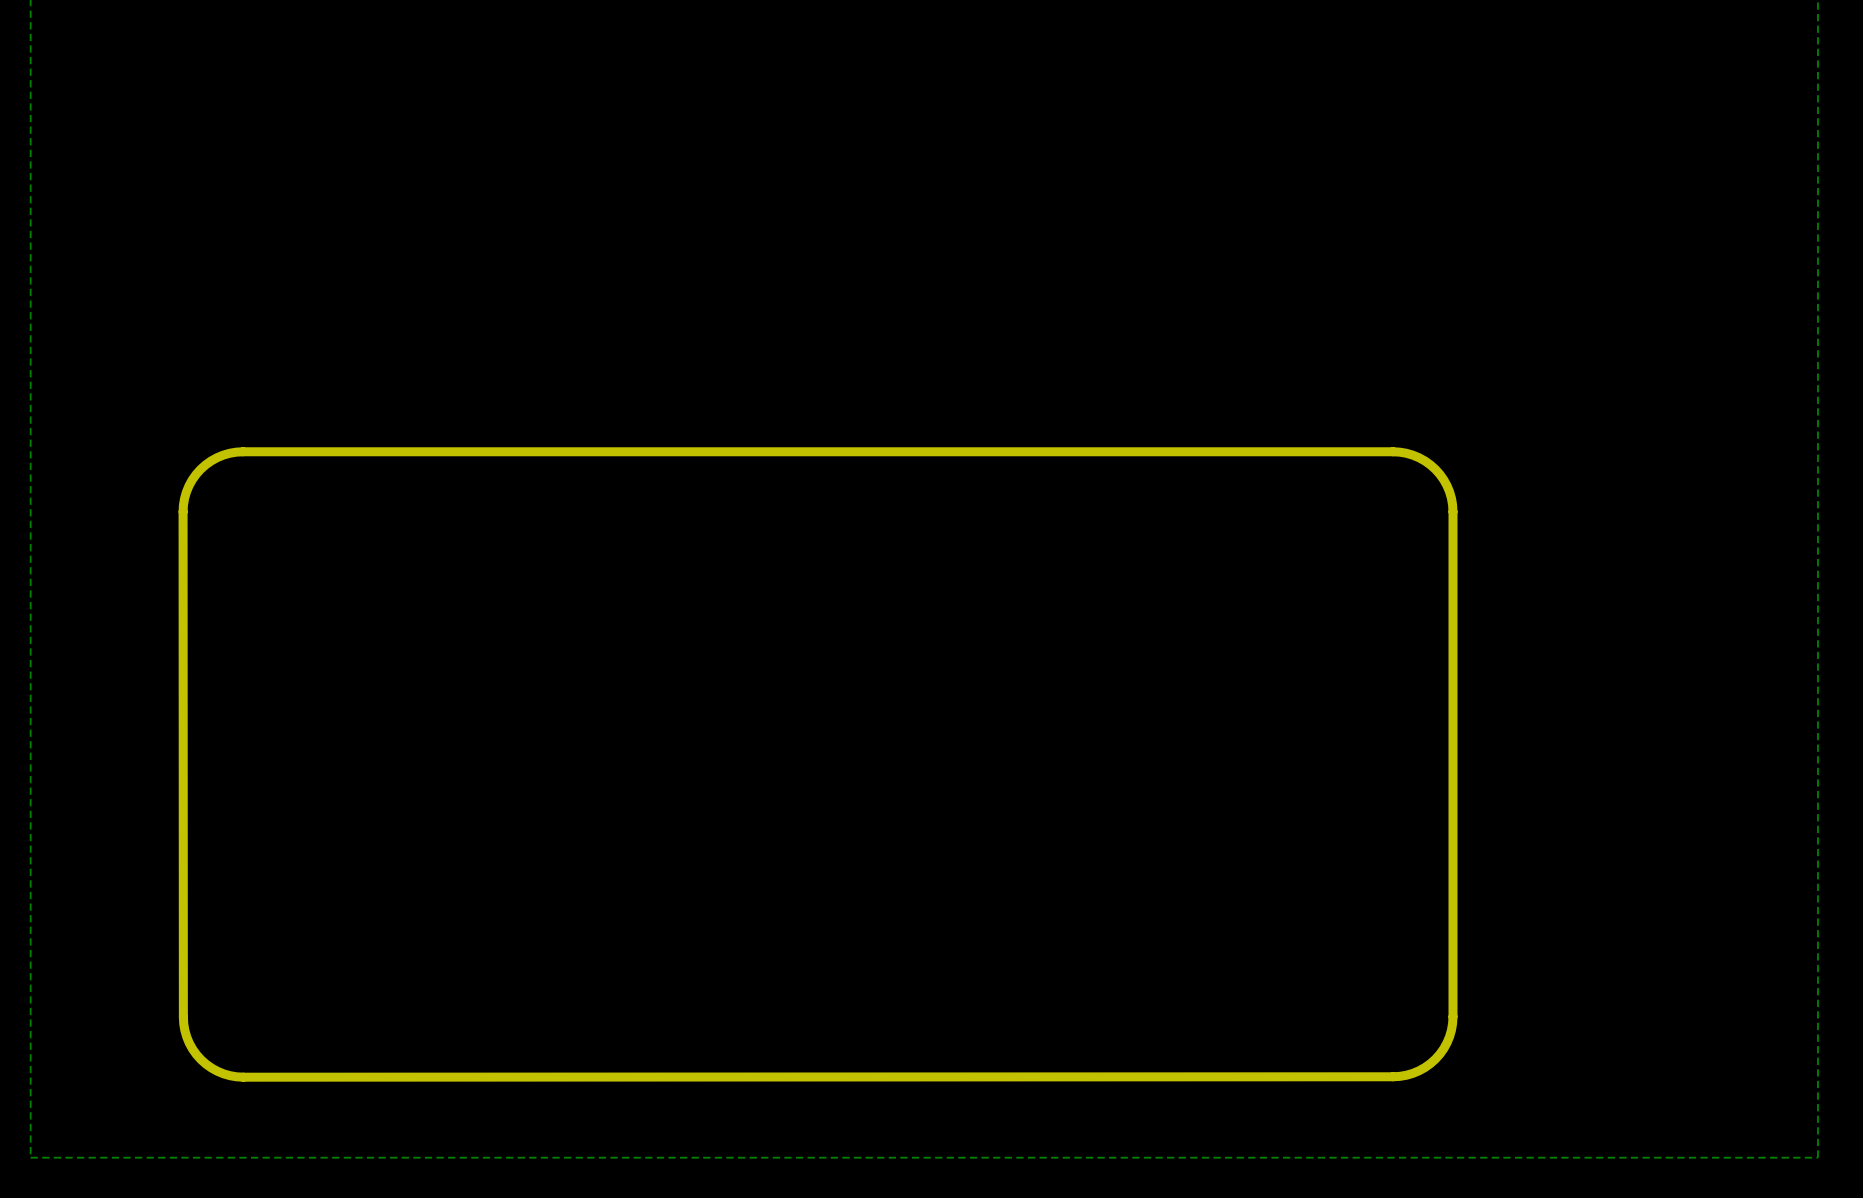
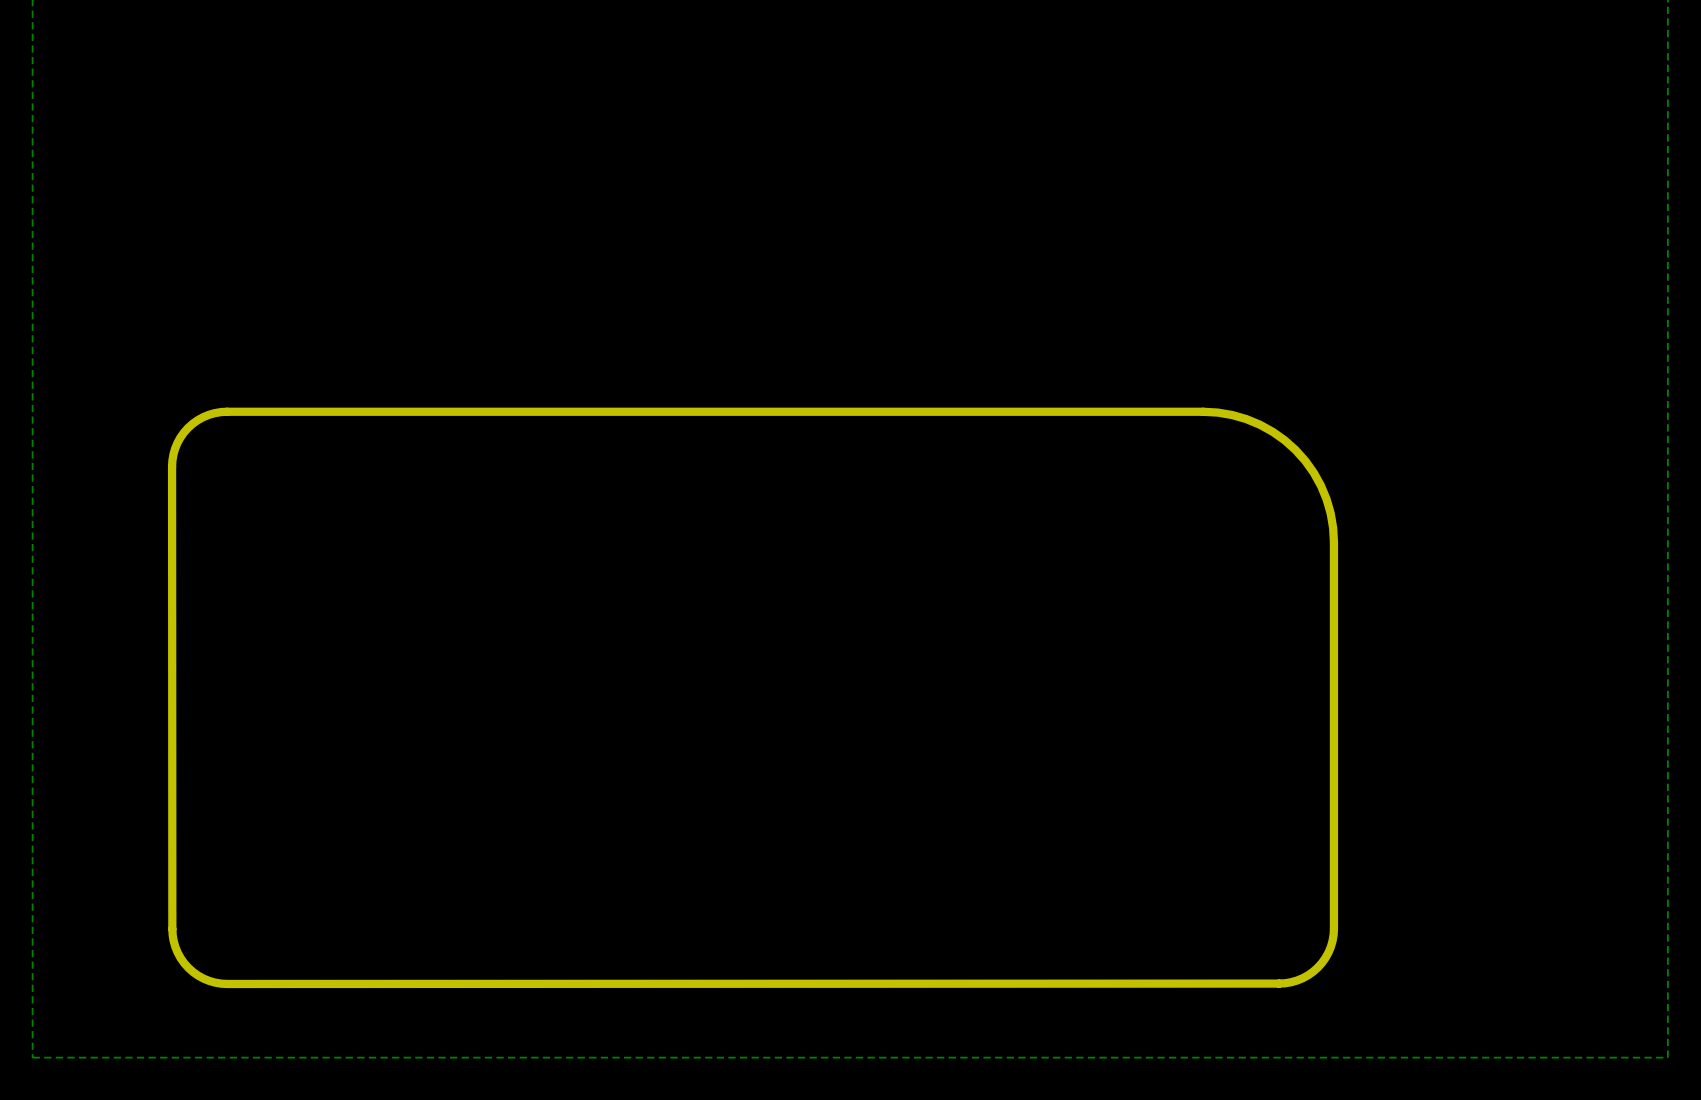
drawing shape: [178, 447, 1458, 1082] -> [167, 407, 1339, 989]

